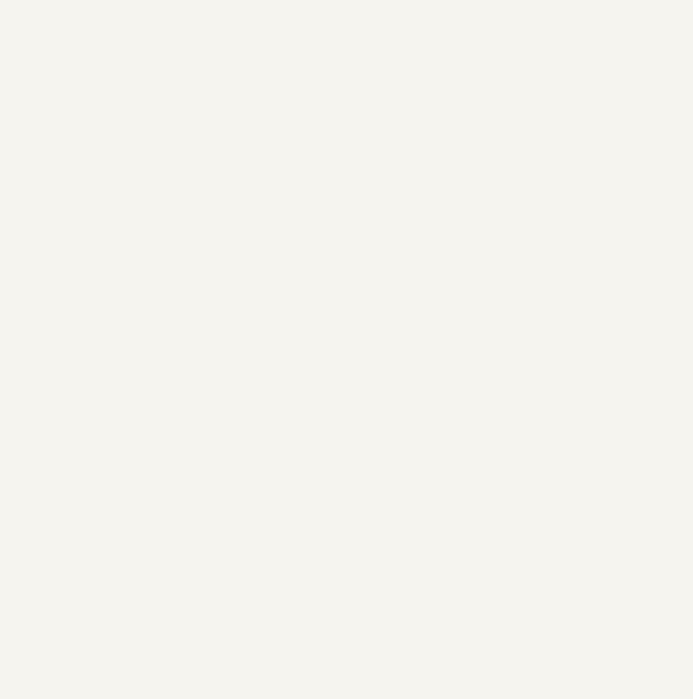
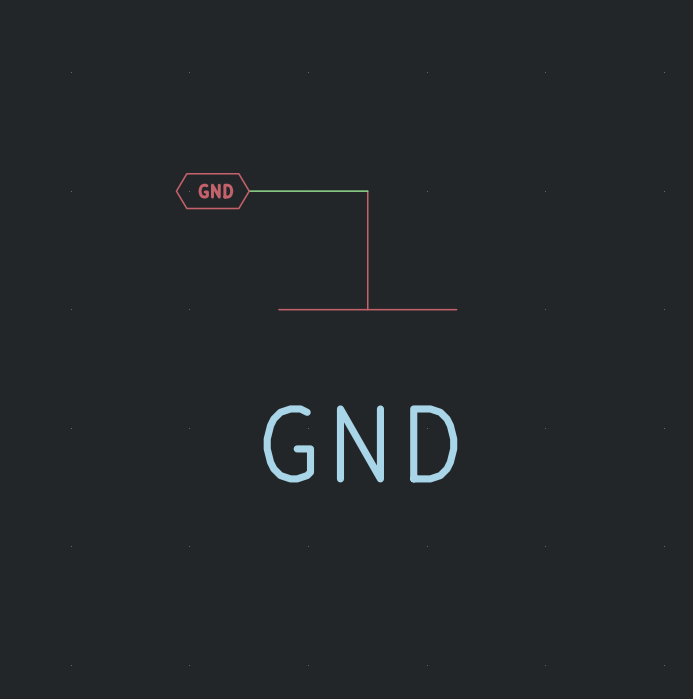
global label: none -> GND (215, 191)
wire: none -> (249, 191) (367, 191)
power symbol: none -> GND (367, 250)

